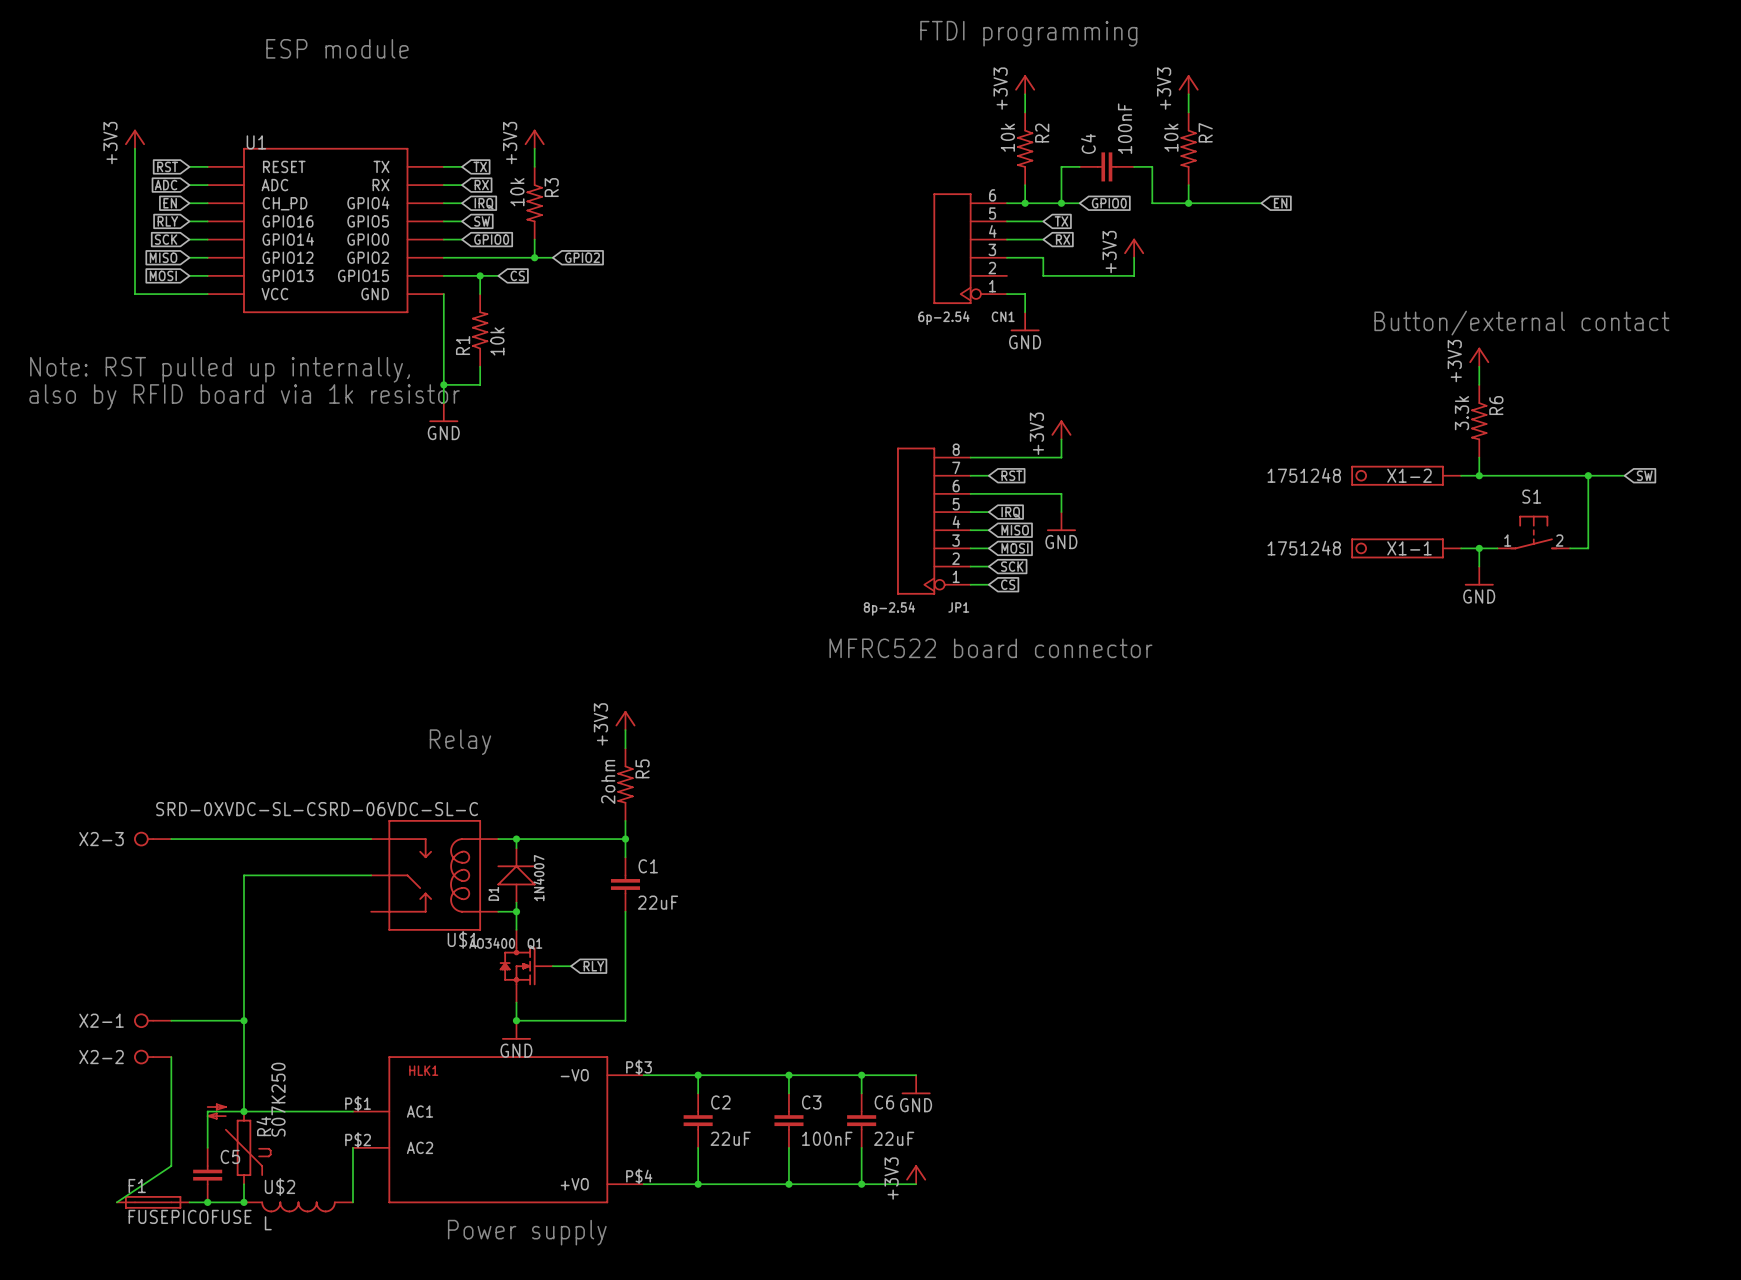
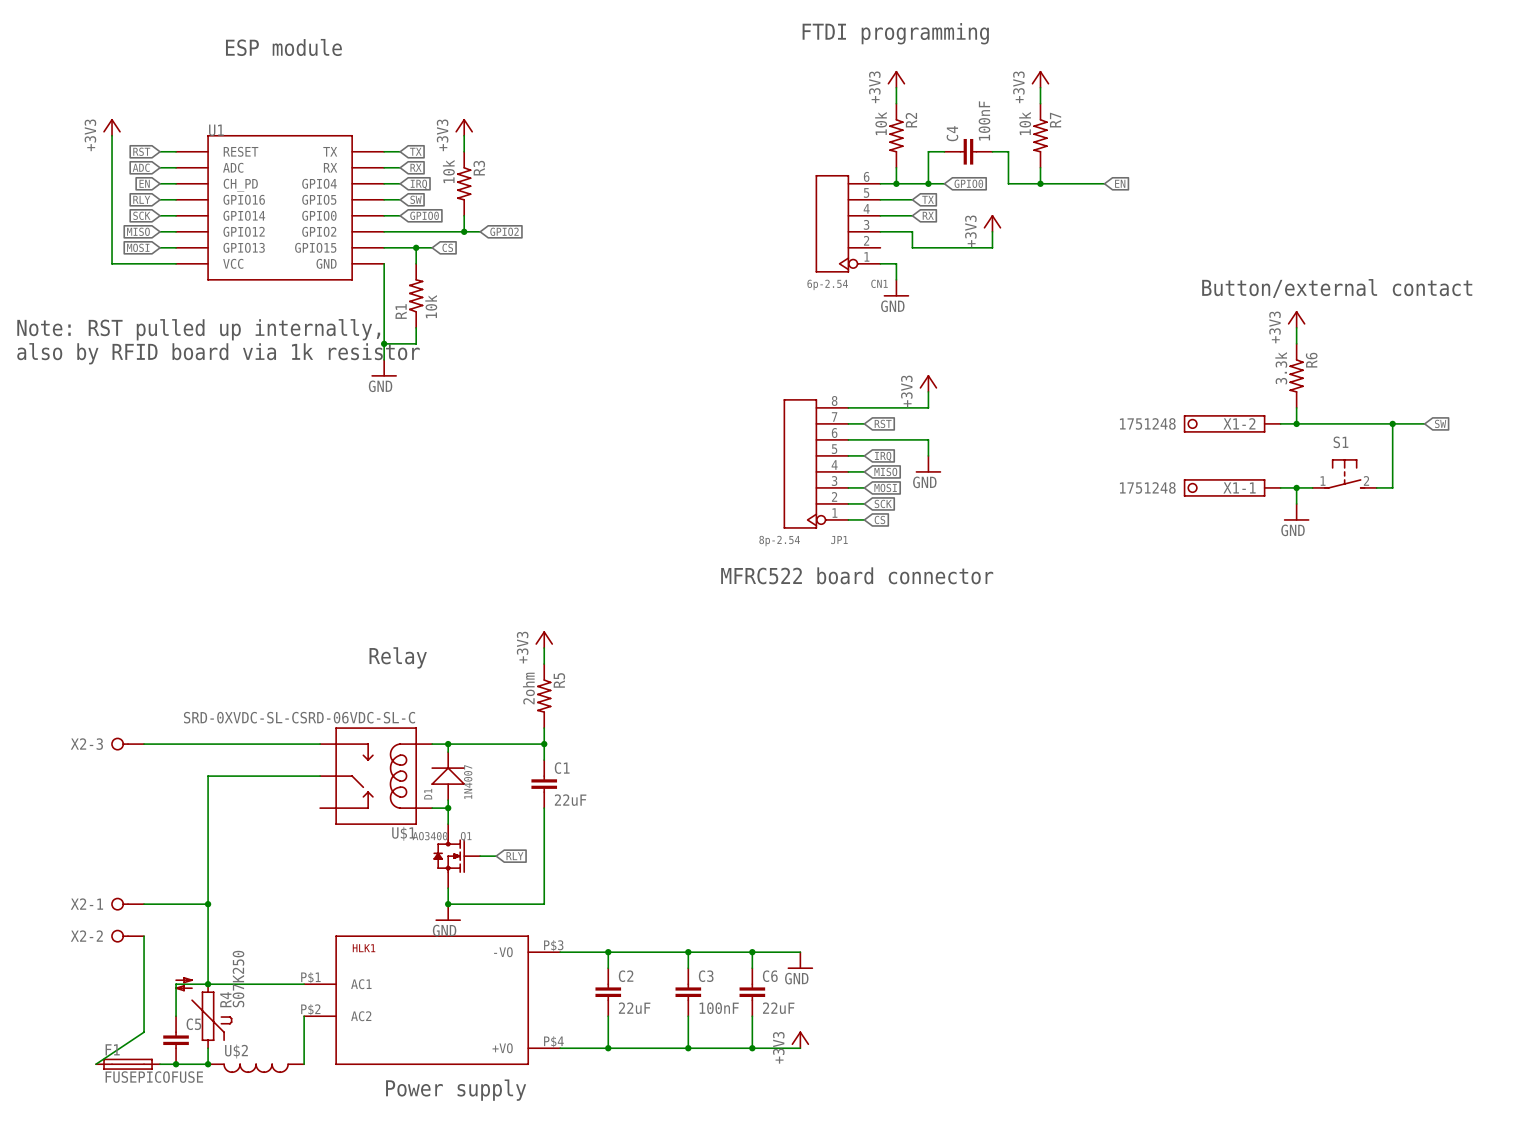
U$2 value: L (268, 1223) -> none

